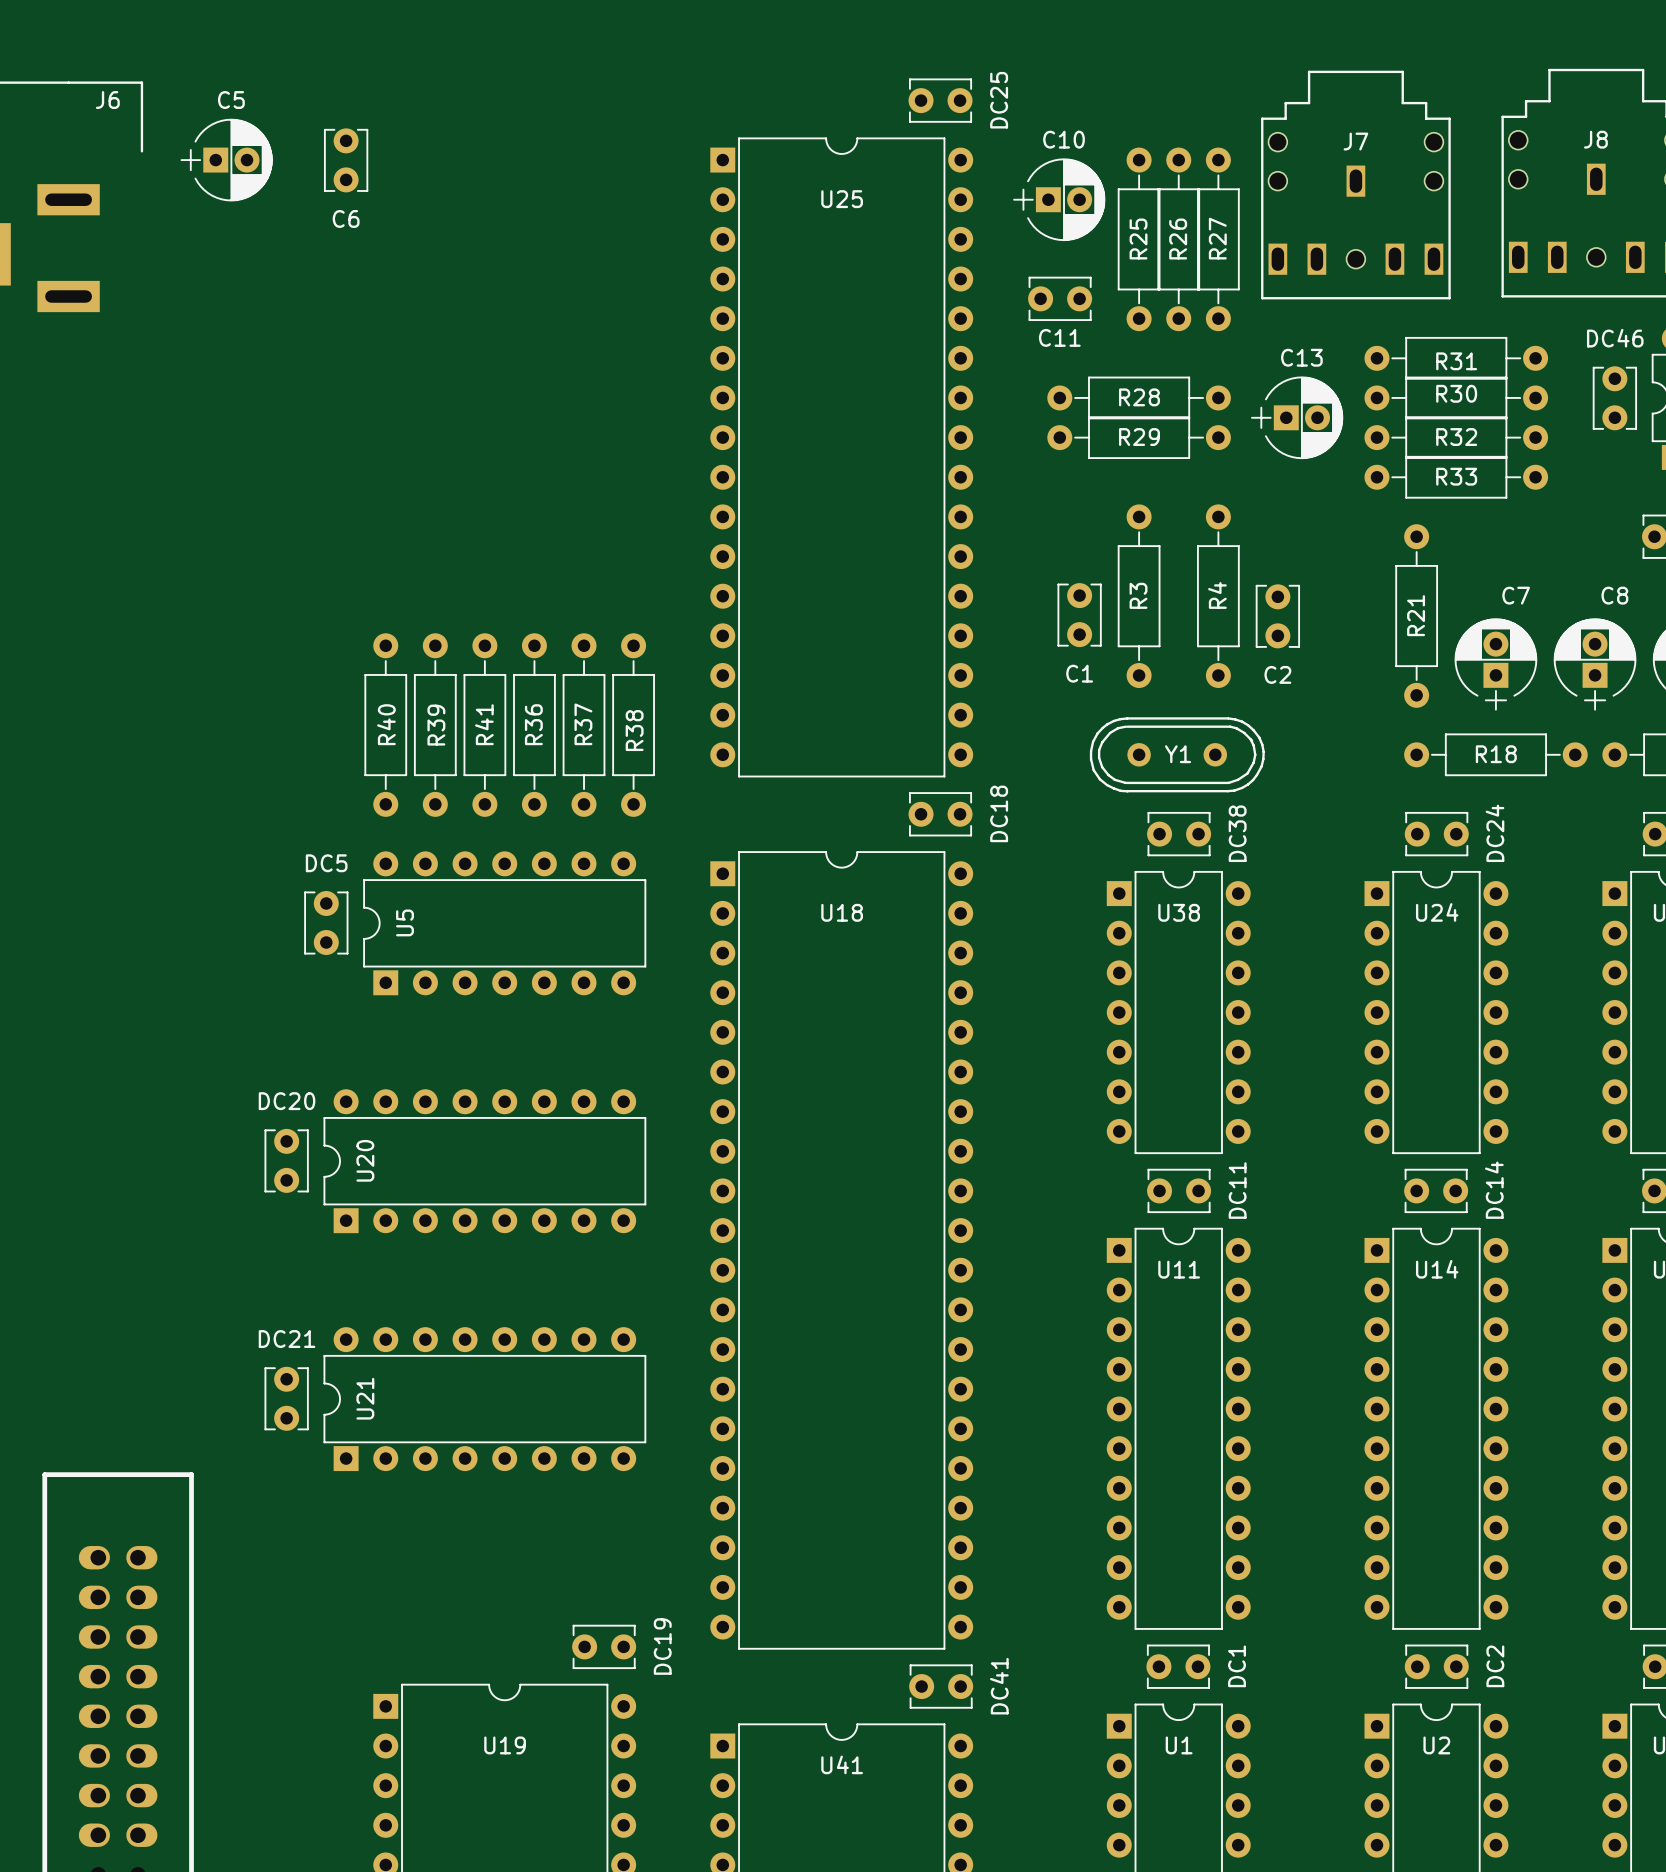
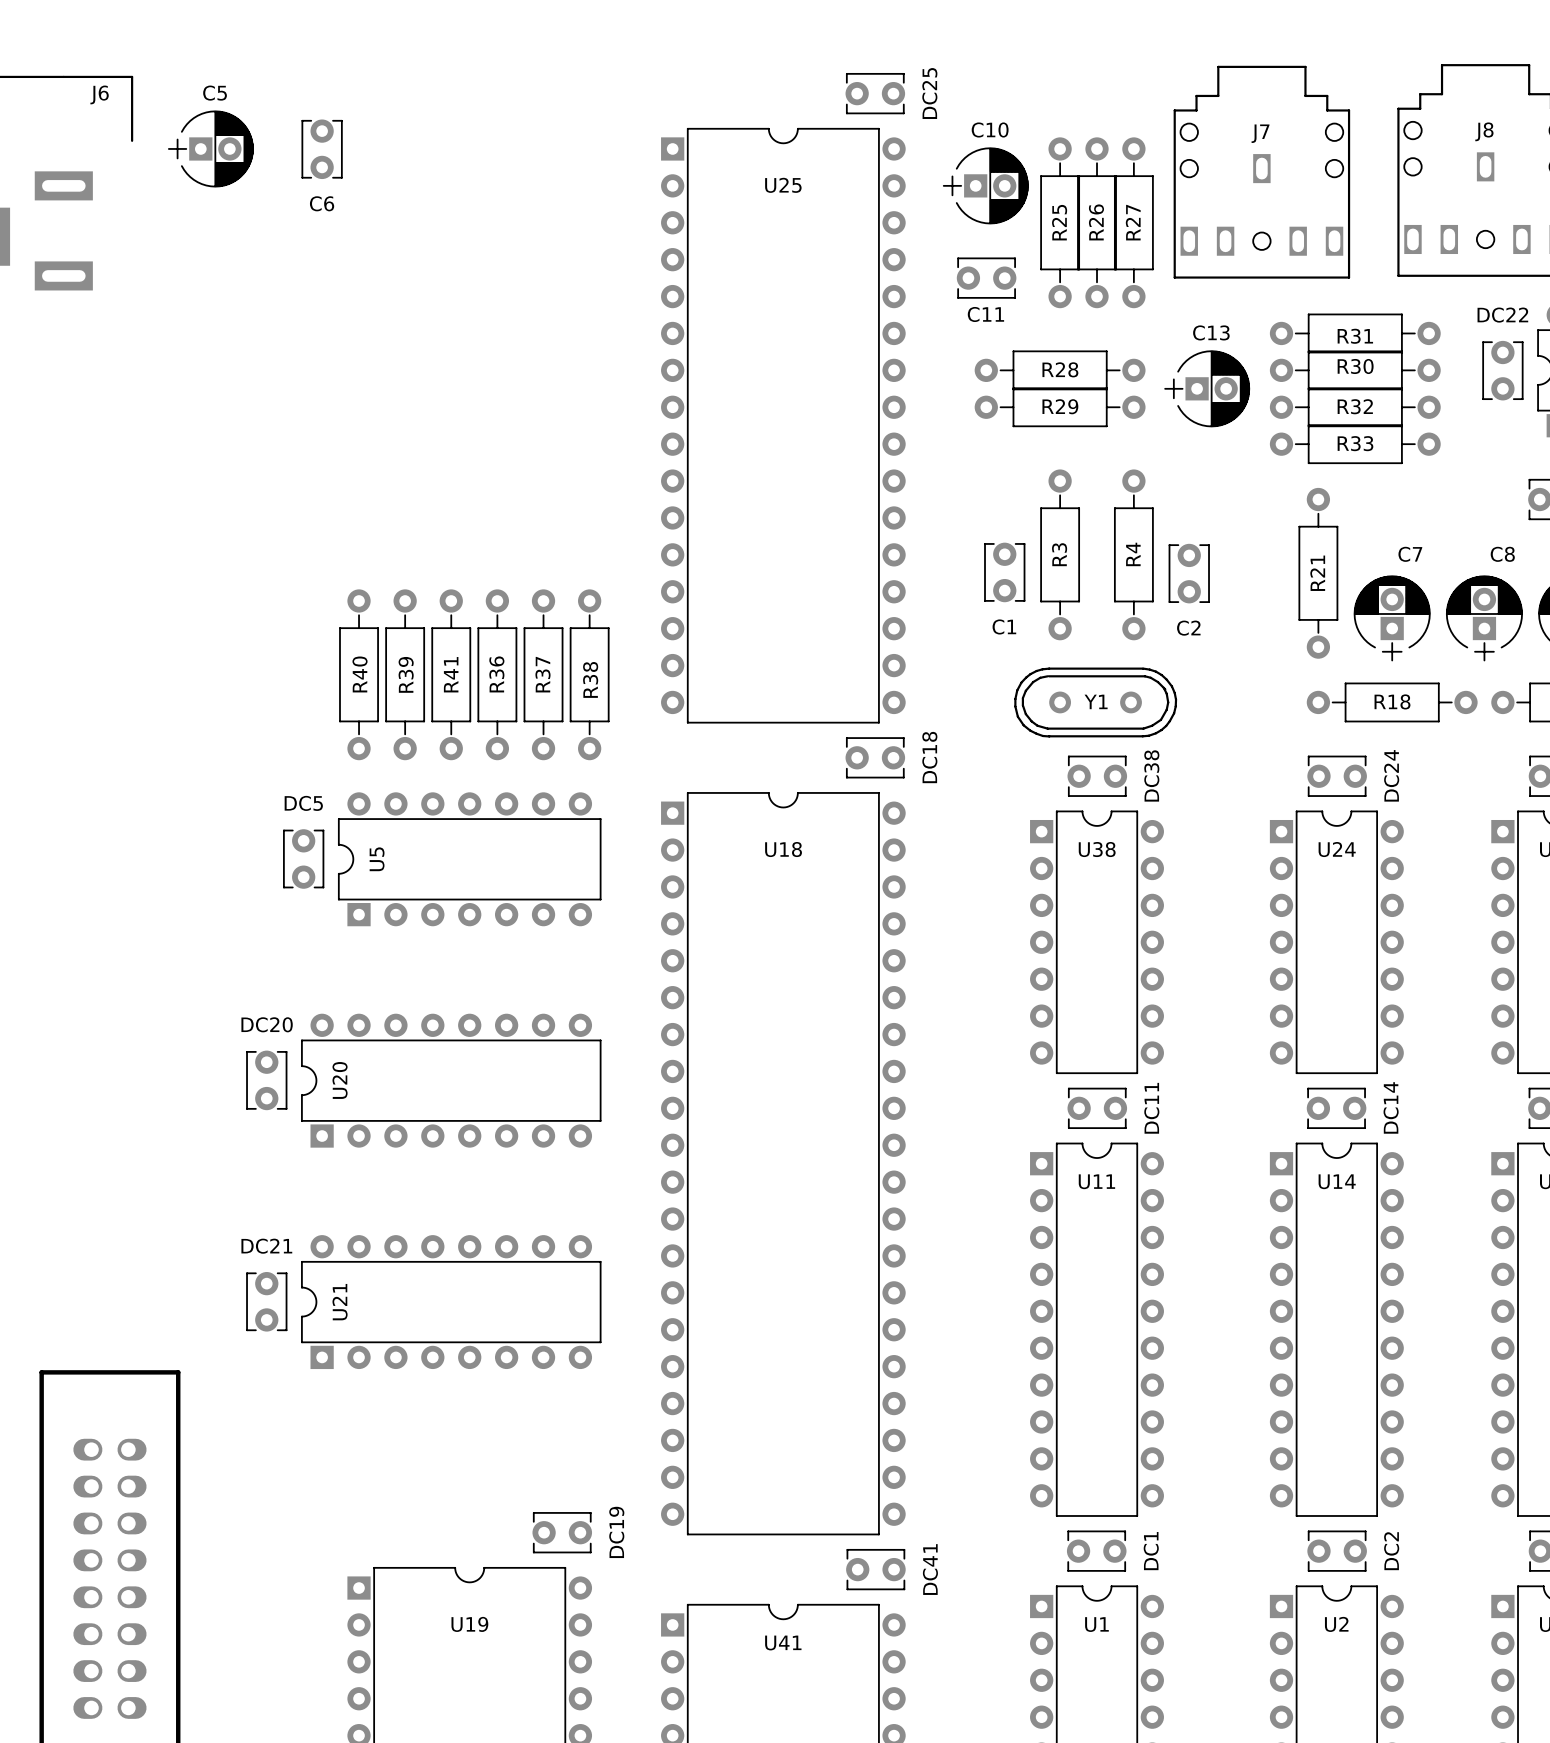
DC46 name: DC46 (1615, 338) -> DC22 (1502, 315)

